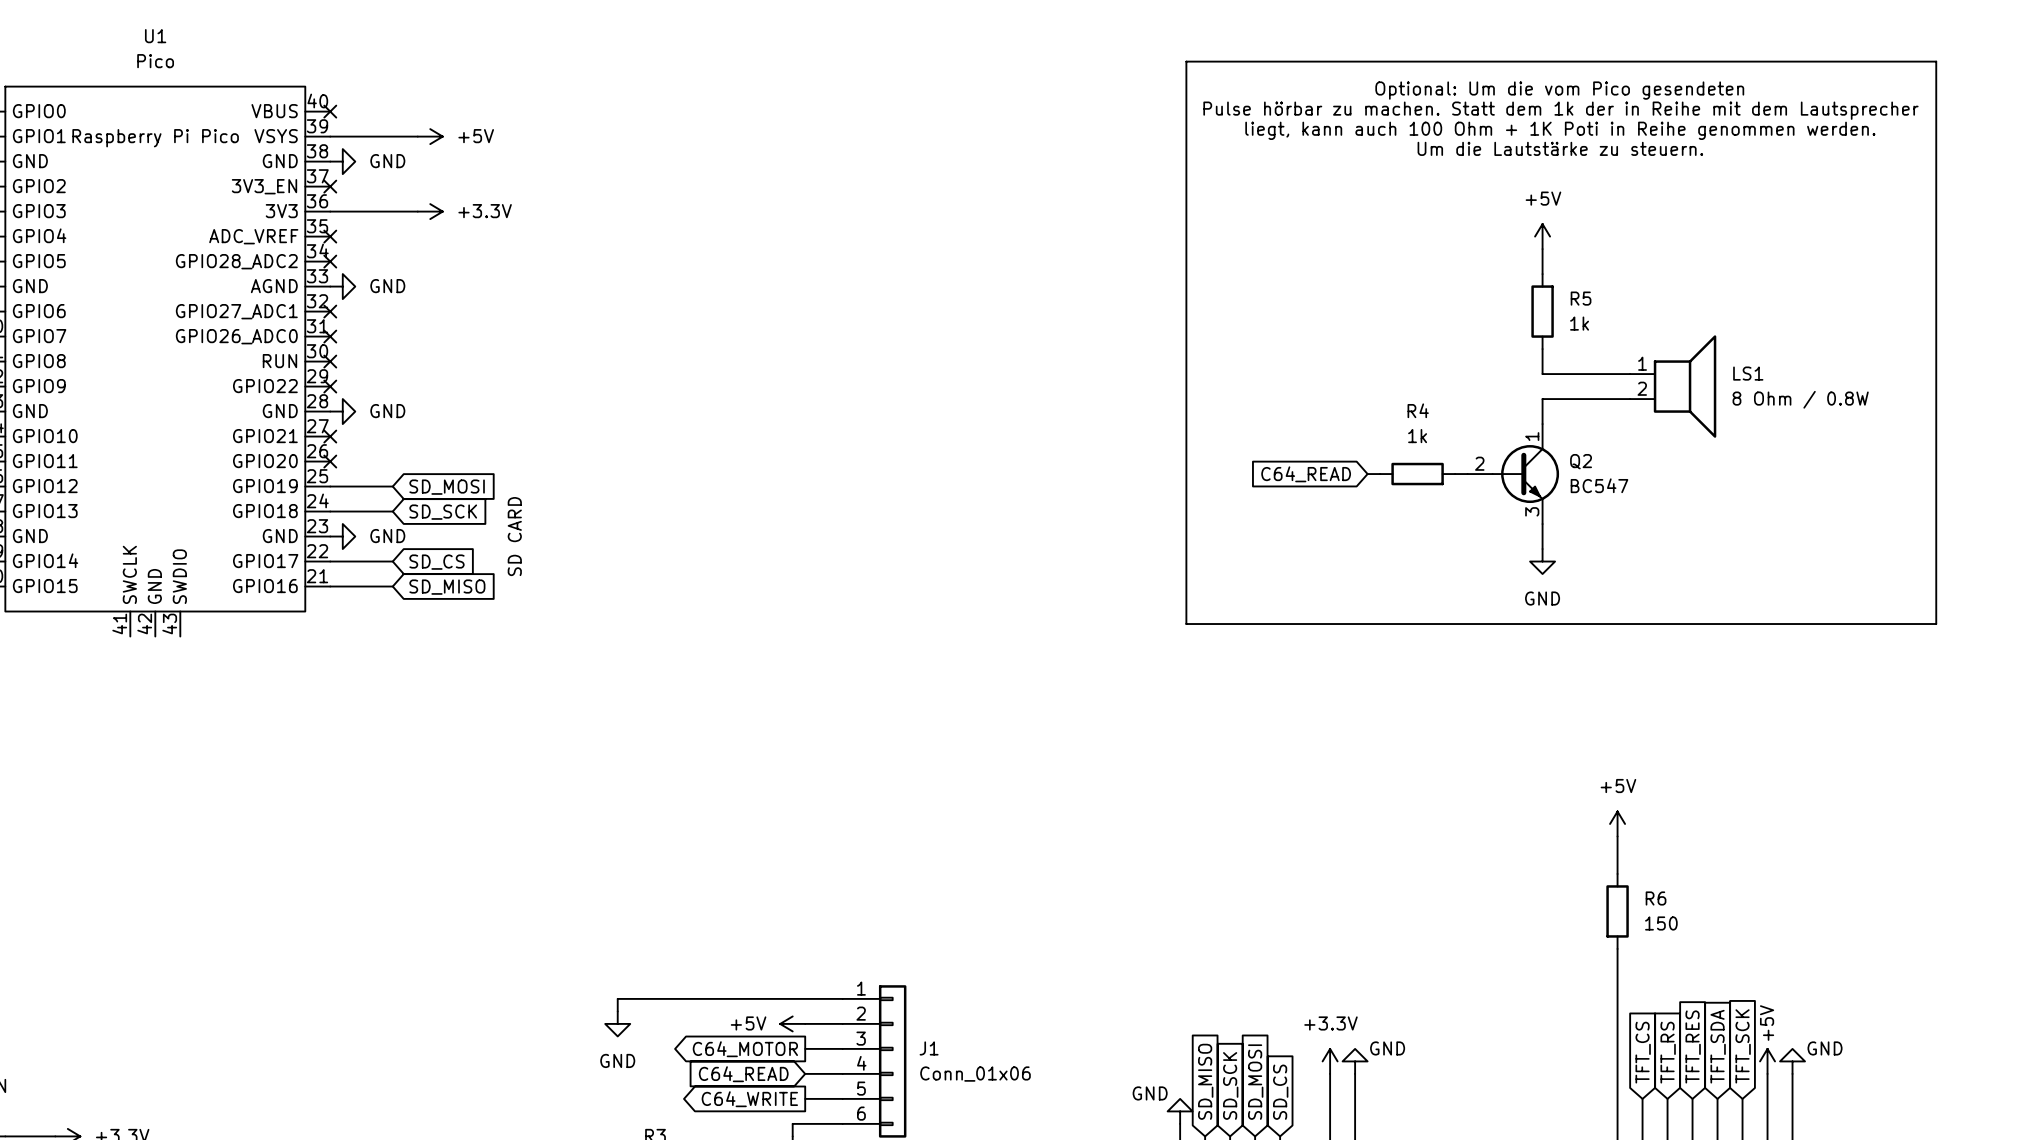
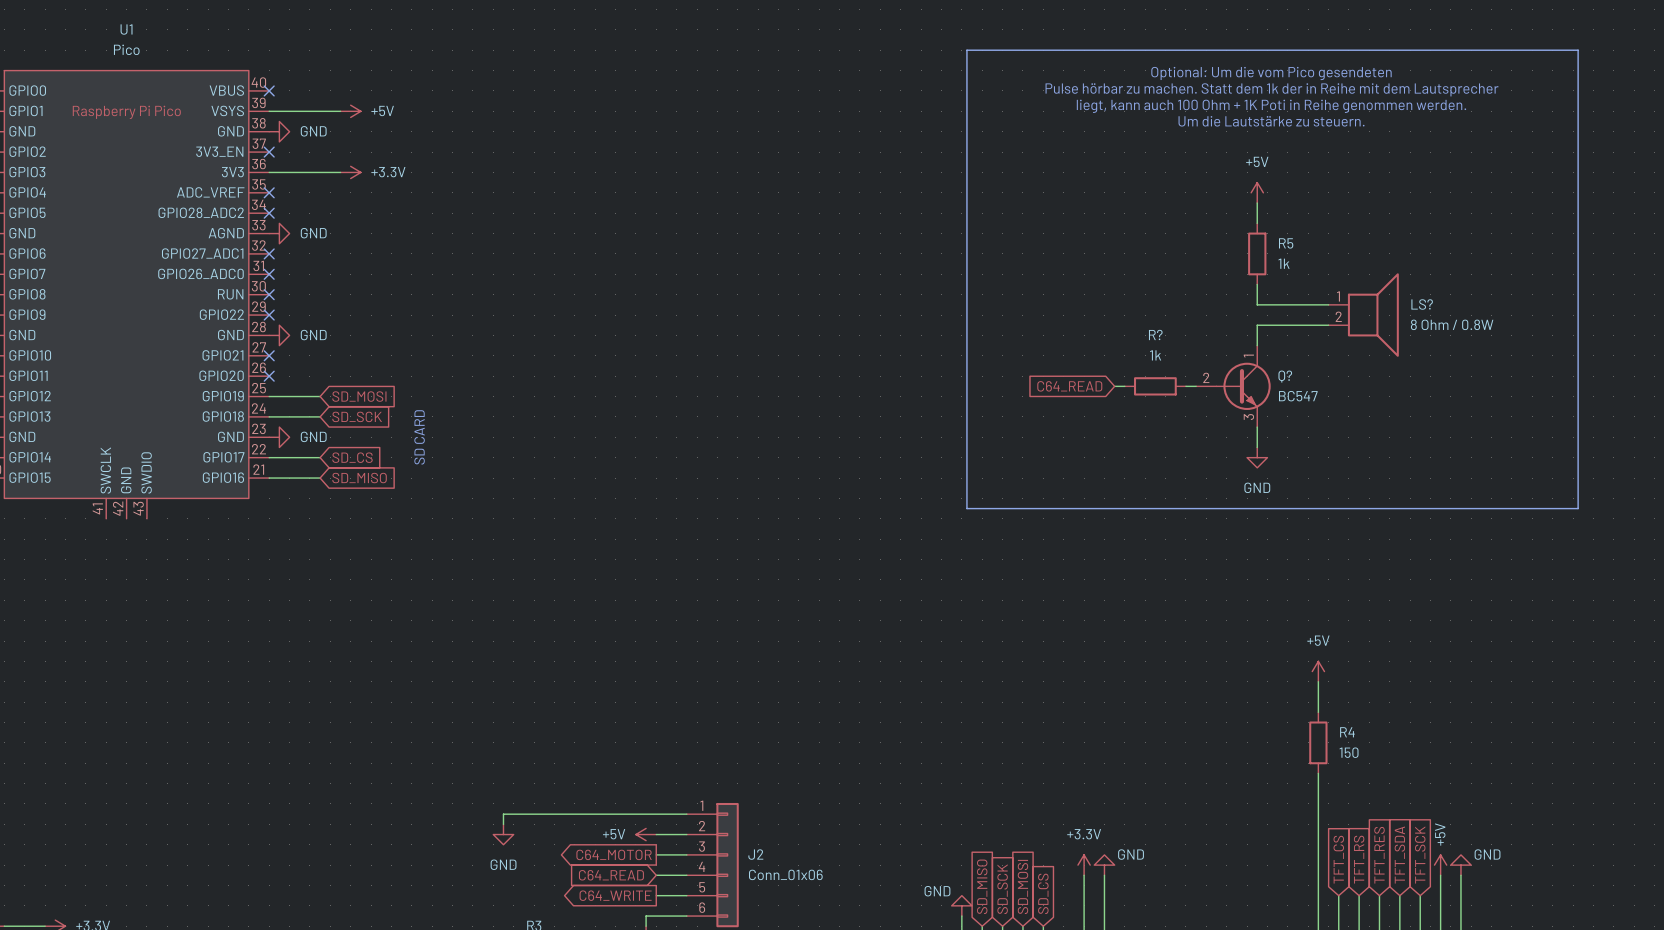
LS1 name: LS1 (1748, 373) -> LS? (1422, 304)
R4 name: R4 (1418, 410) -> R? (1155, 334)
Q2 name: Q2 (1581, 461) -> Q? (1285, 376)
R6 name: R6 (1656, 898) -> R4 (1347, 732)
J1 name: J1 (929, 1048) -> J2 (755, 854)

